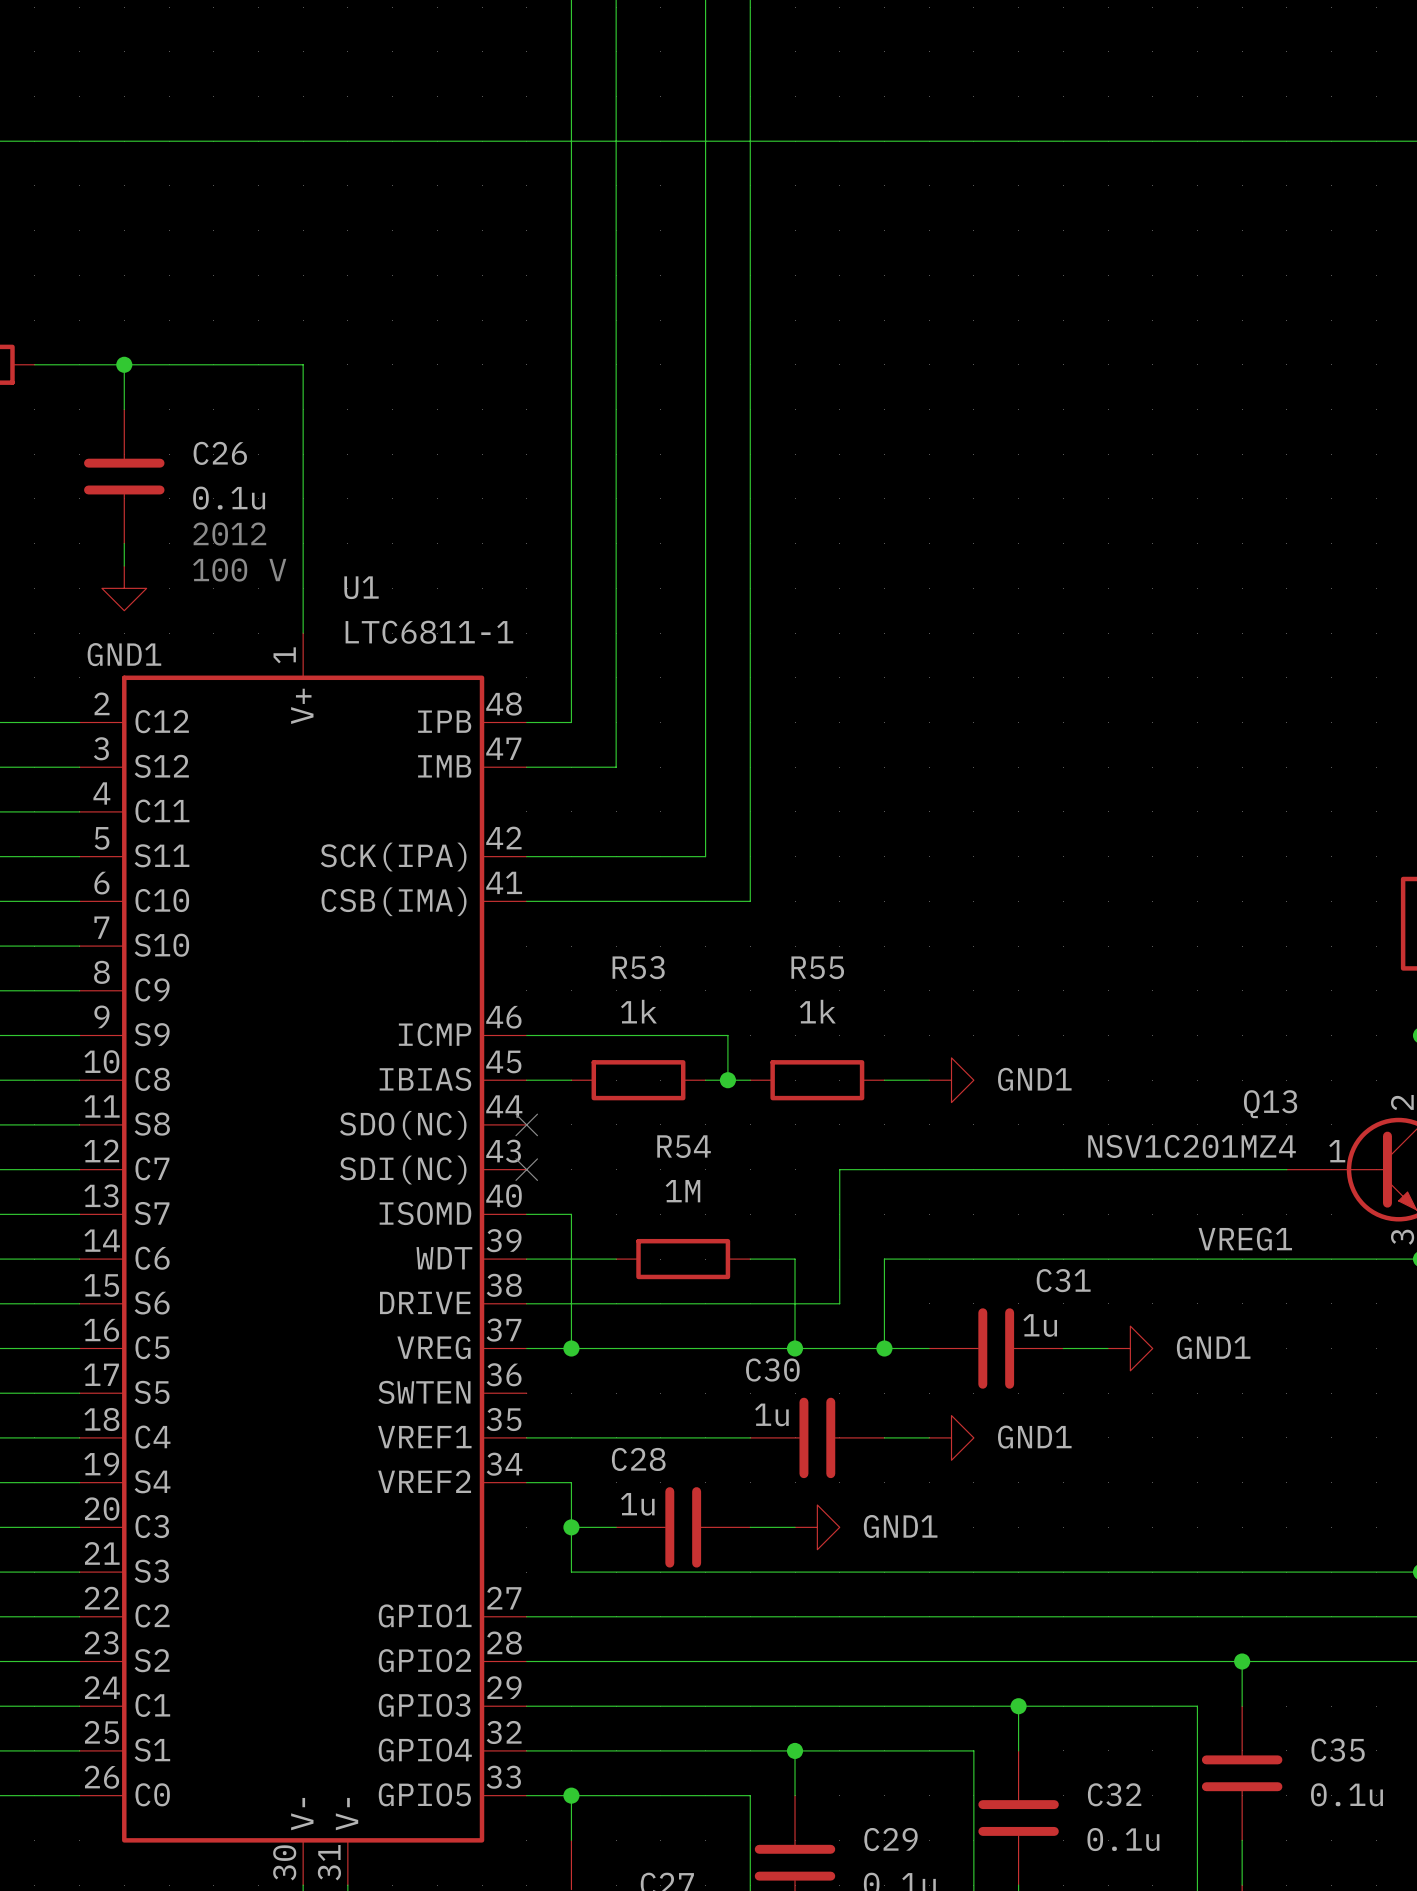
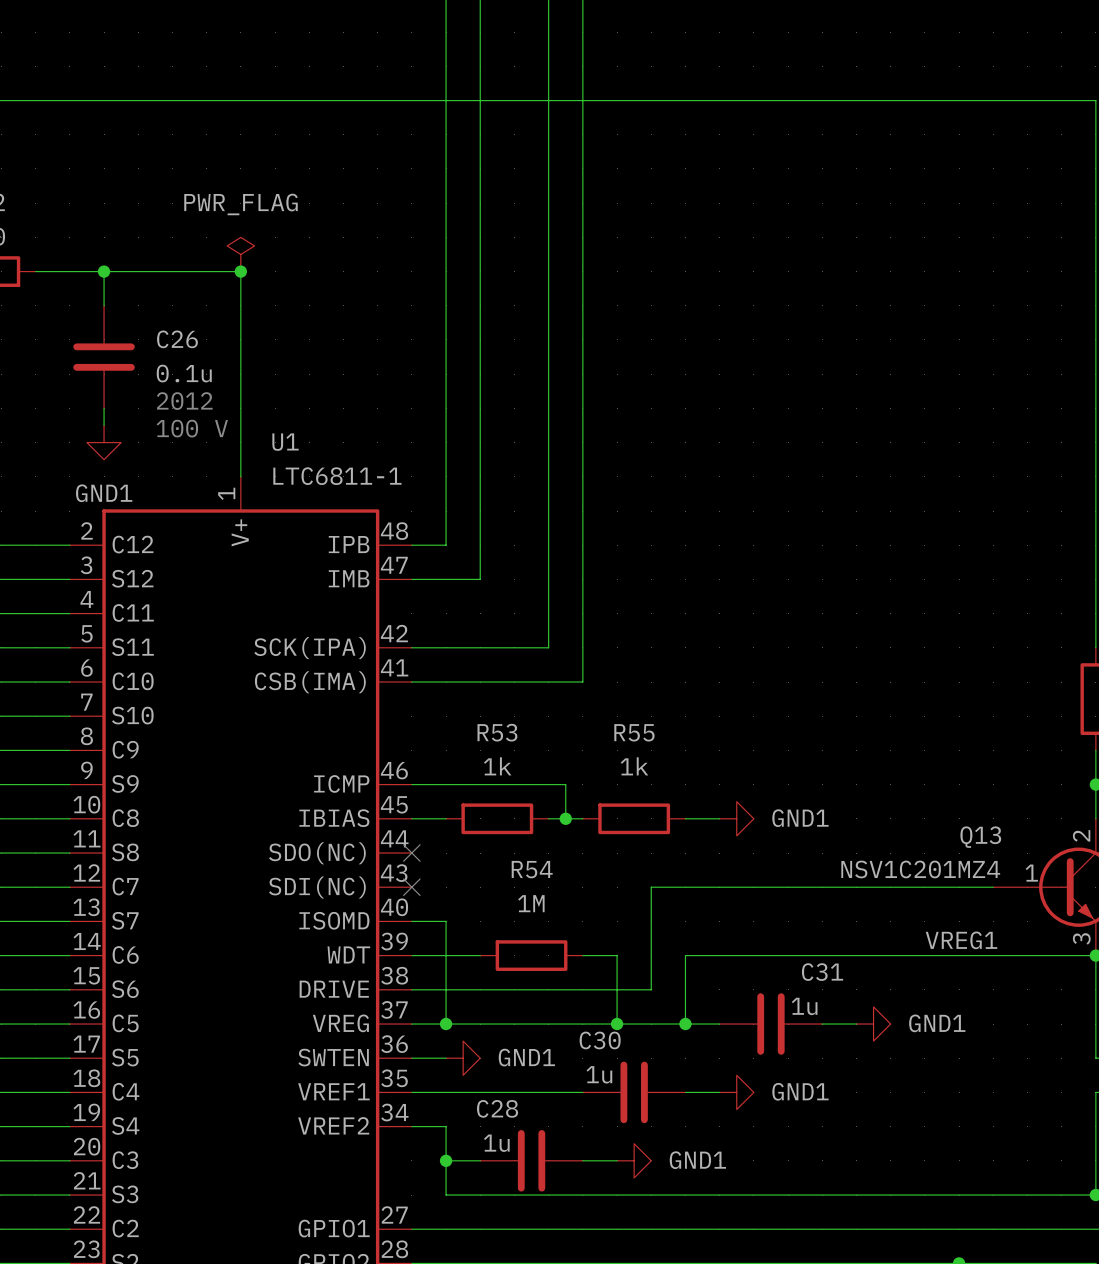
power symbol: none -> PWR_FLAG (240, 254)
junction: none -> (240, 271)
wire: none -> (411, 1058) (446, 1058)
power symbol: none -> GND1 (463, 1058)

